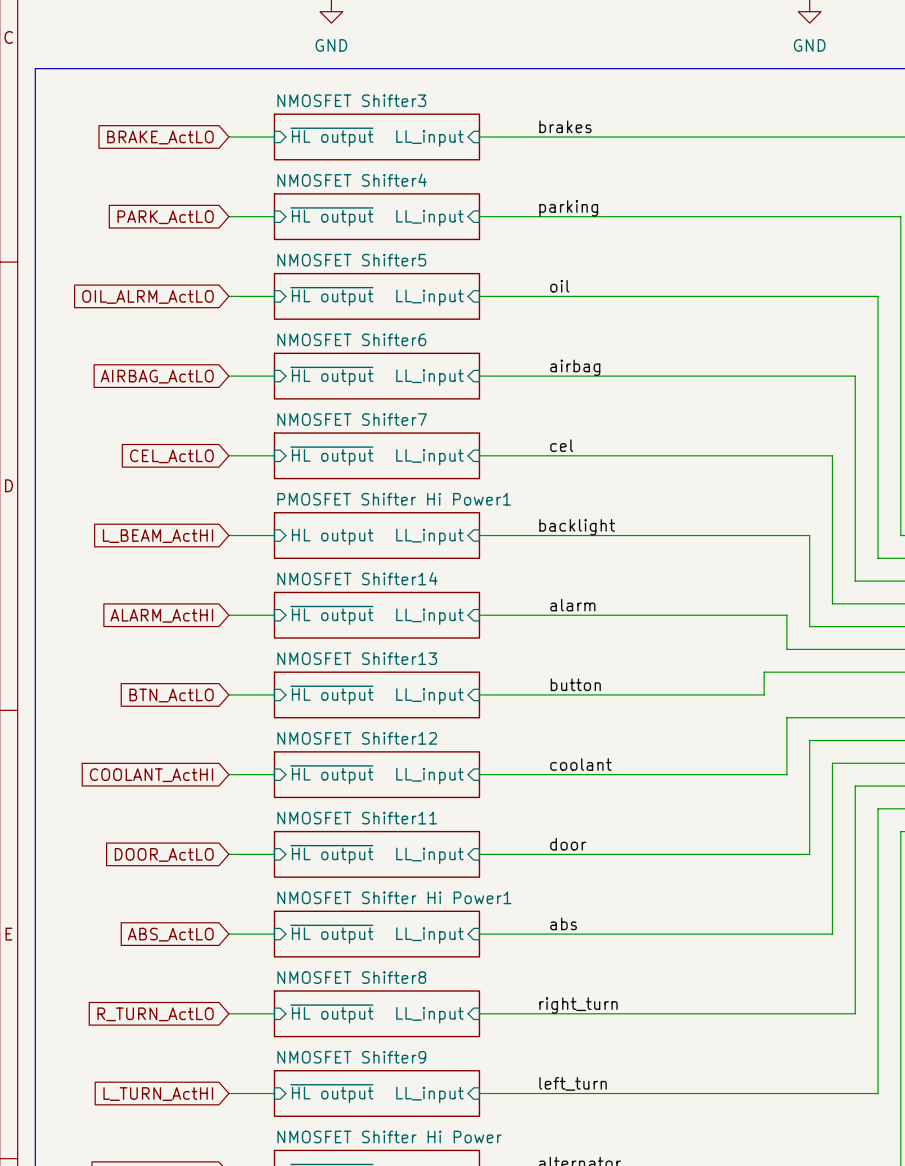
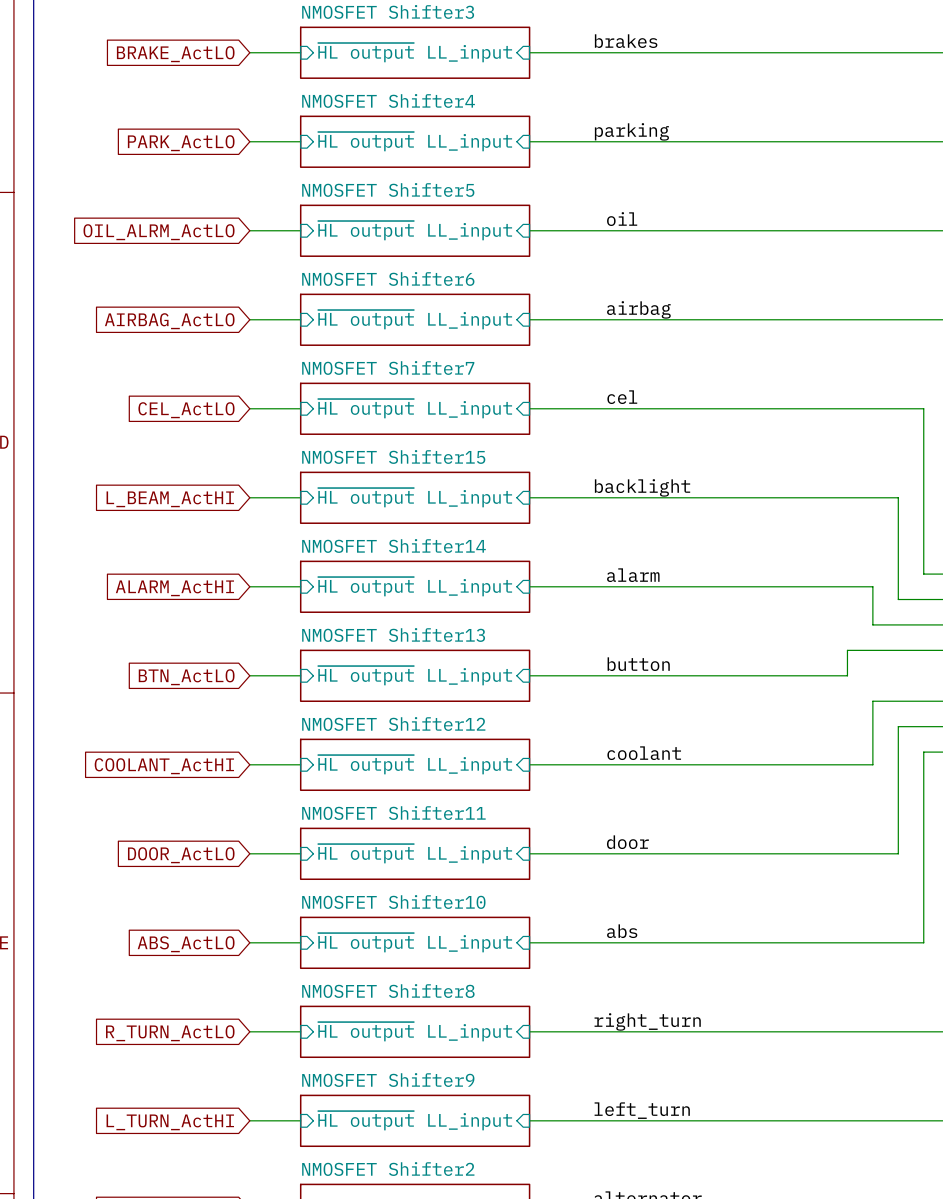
sheet PMOSFET Shifter Hi Power1 name: PMOSFET Shifter Hi Power1 (394, 499) -> NMOSFET Shifter15 (393, 456)
sheet pin: HL output (332, 537) -> ~{HL output} (366, 497)
sheet NMOSFET Shifter Hi Power1 name: NMOSFET Shifter Hi Power1 (394, 897) -> NMOSFET Shifter10 (393, 902)
sheet NMOSFET Shifter Hi Power name: NMOSFET Shifter Hi Power (389, 1136) -> NMOSFET Shifter2 (388, 1169)

